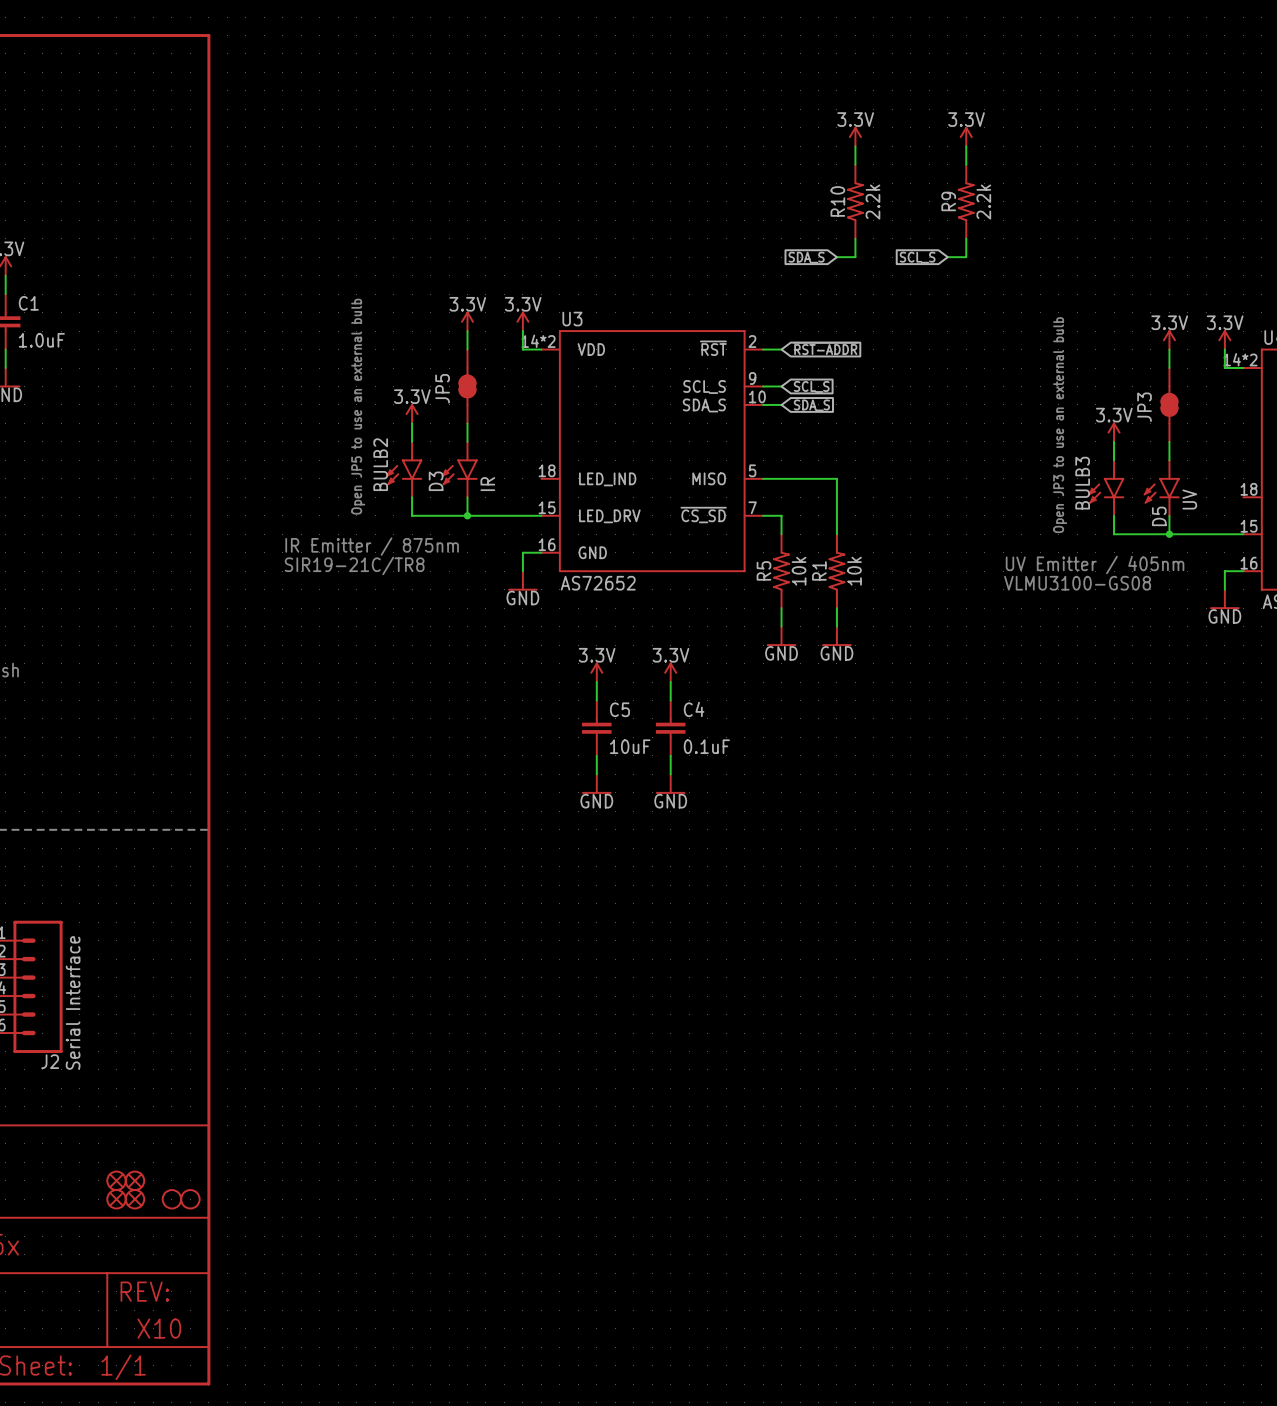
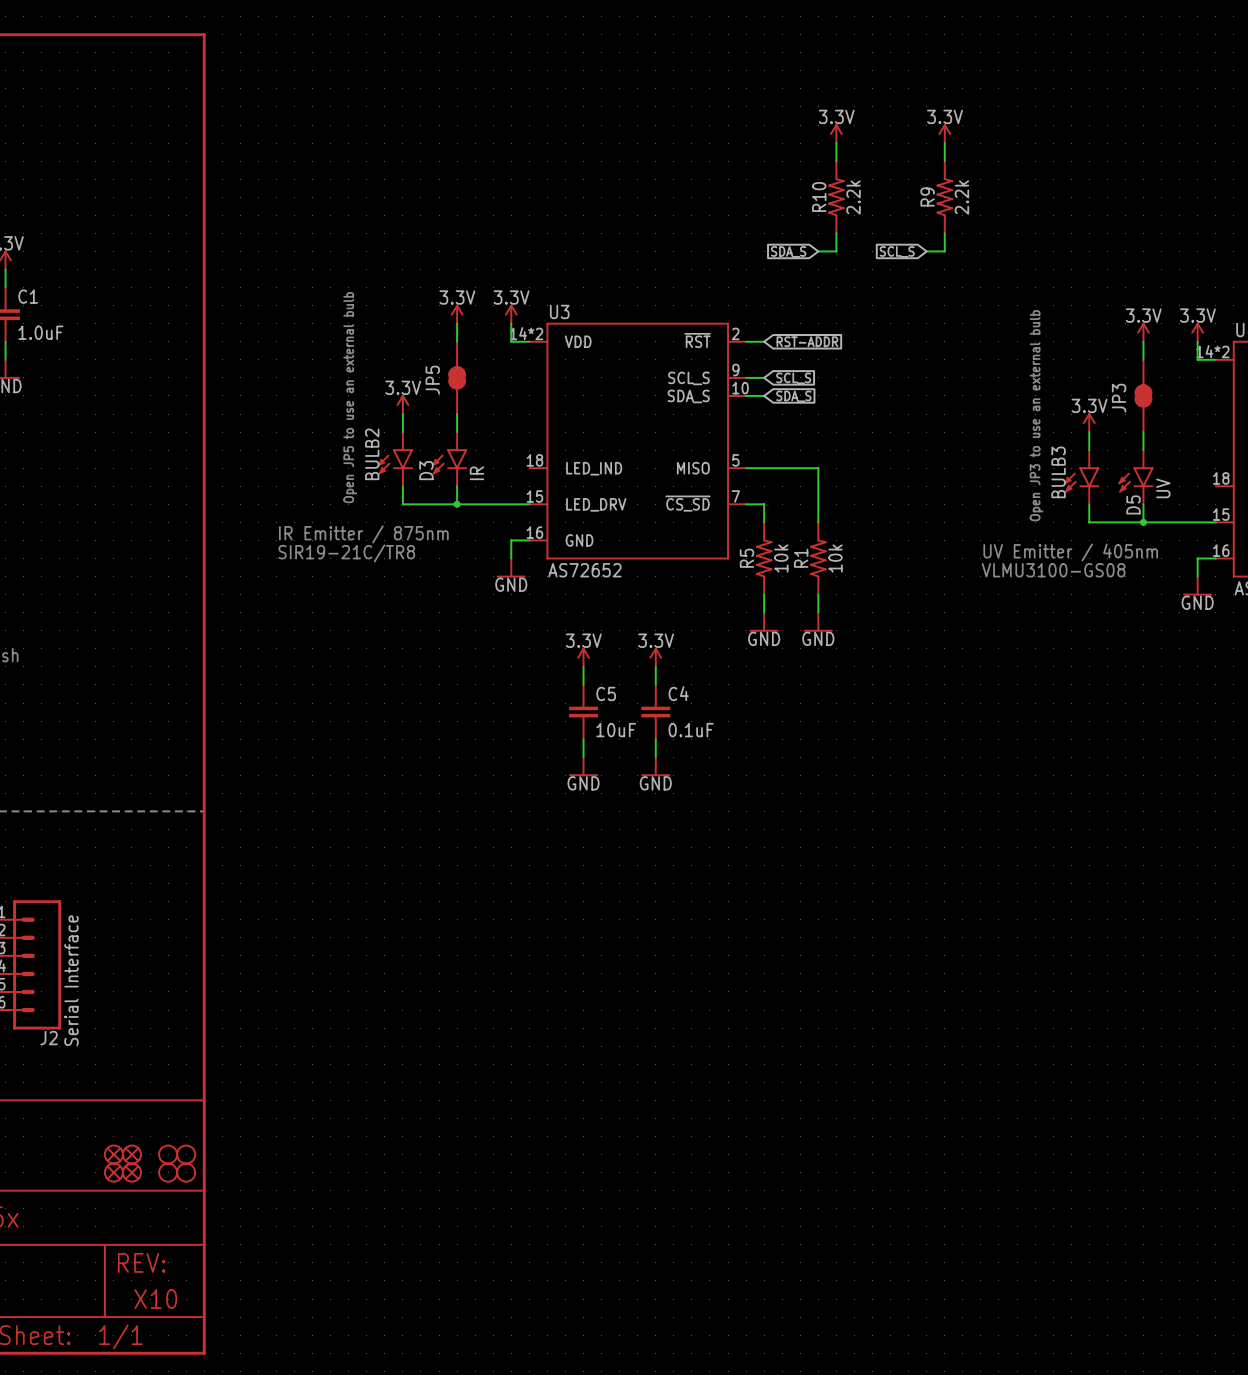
part: none -> (168, 1154)
part: none -> (186, 1154)

